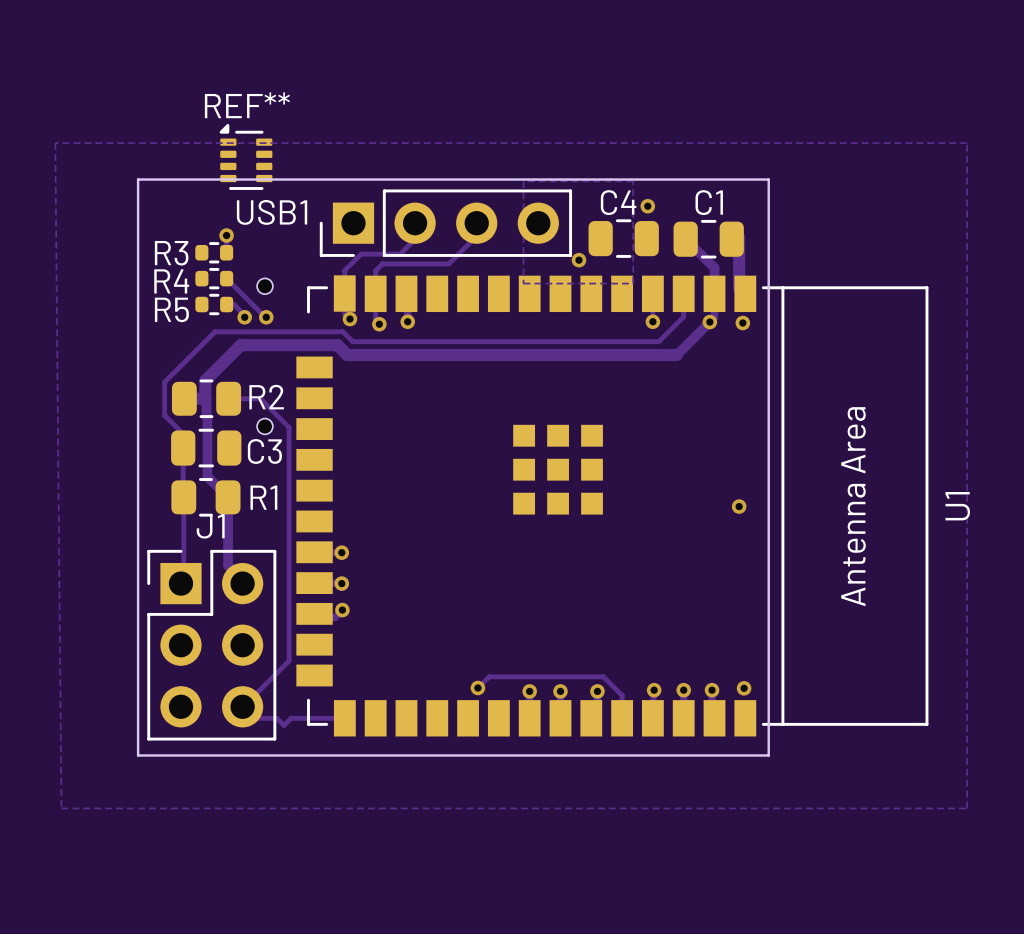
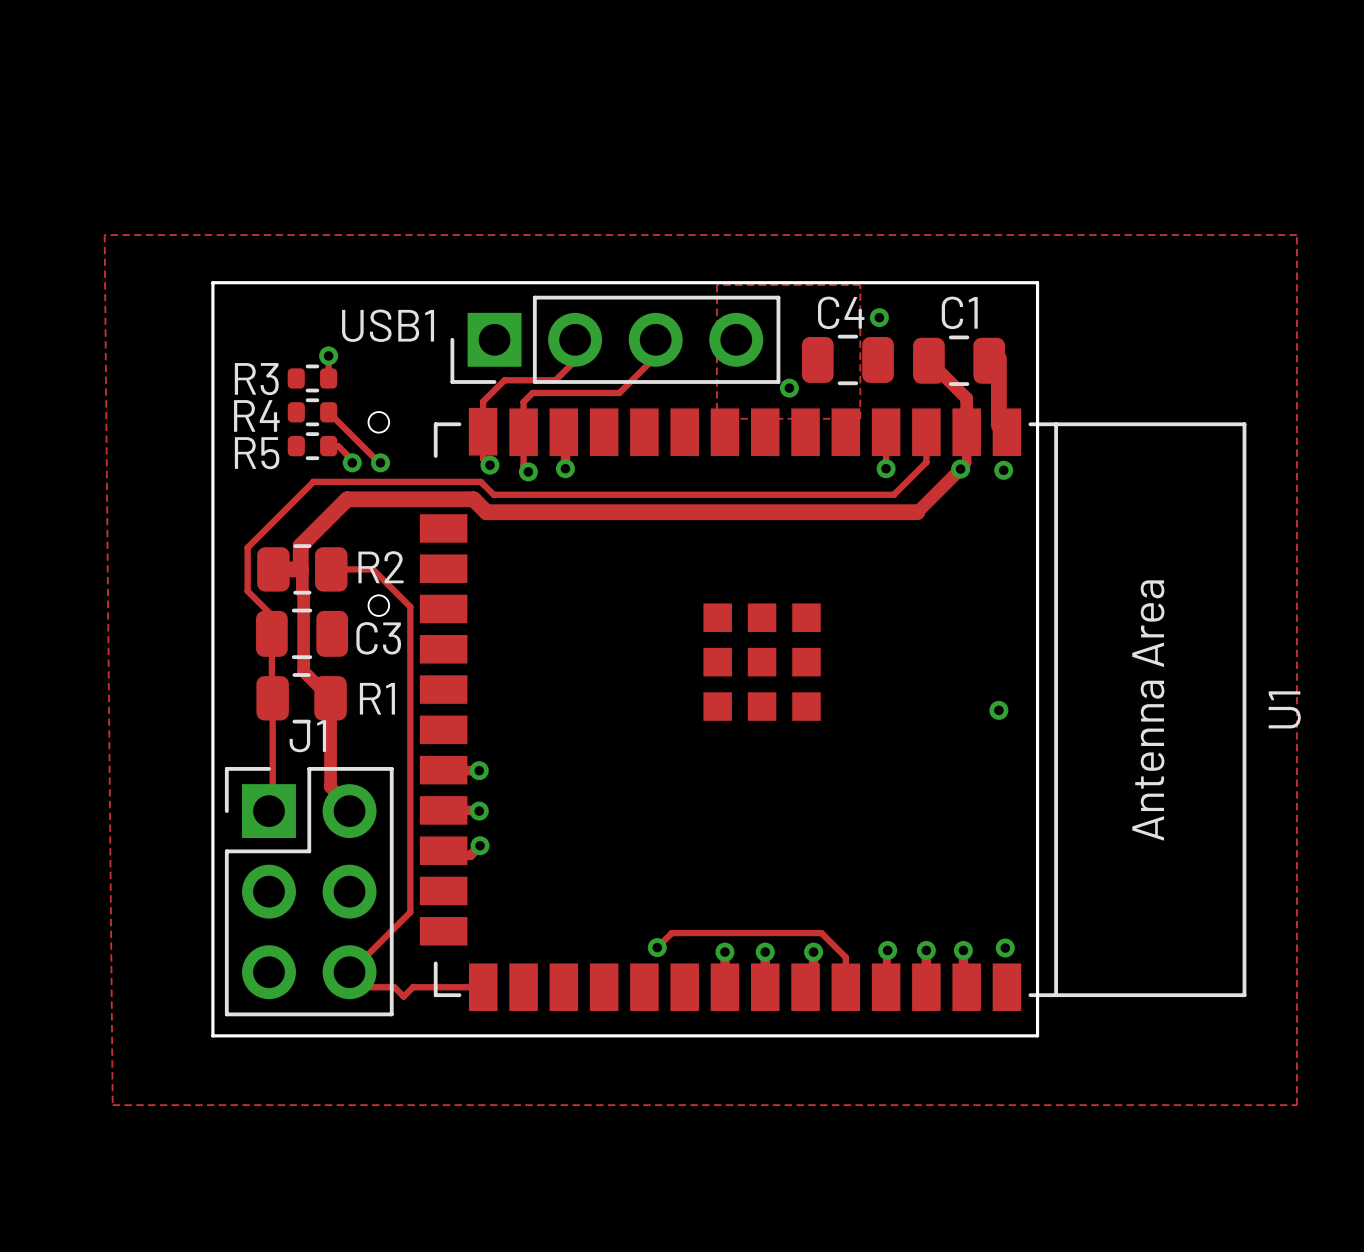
REF**: (245, 156) -> none

